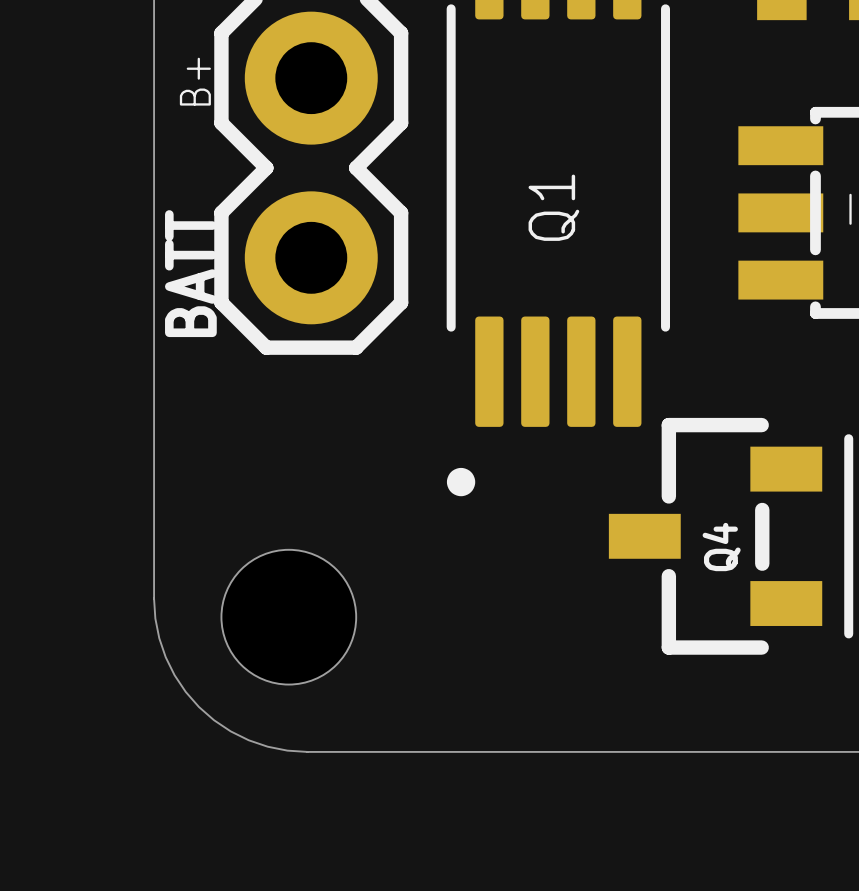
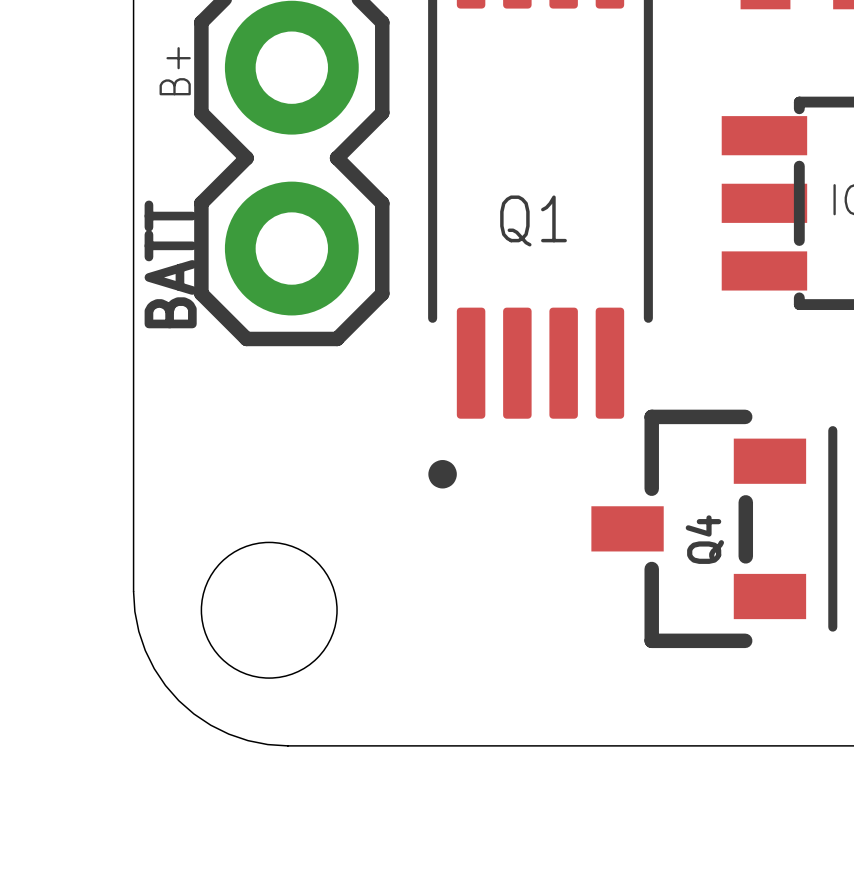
Q1 name rotation: 0° (553, 207) -> 90° clockwise (533, 220)

